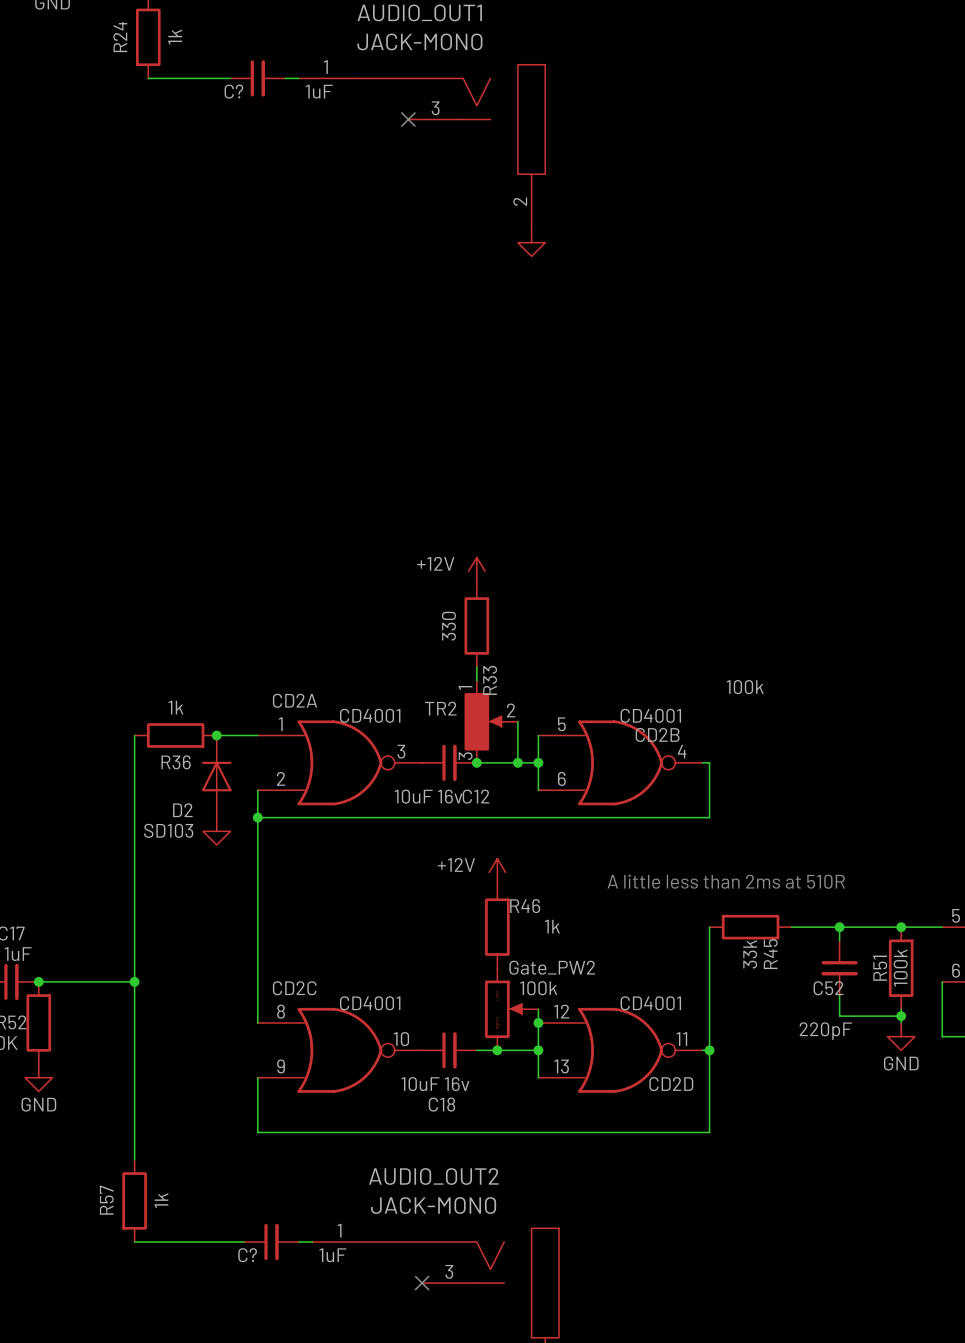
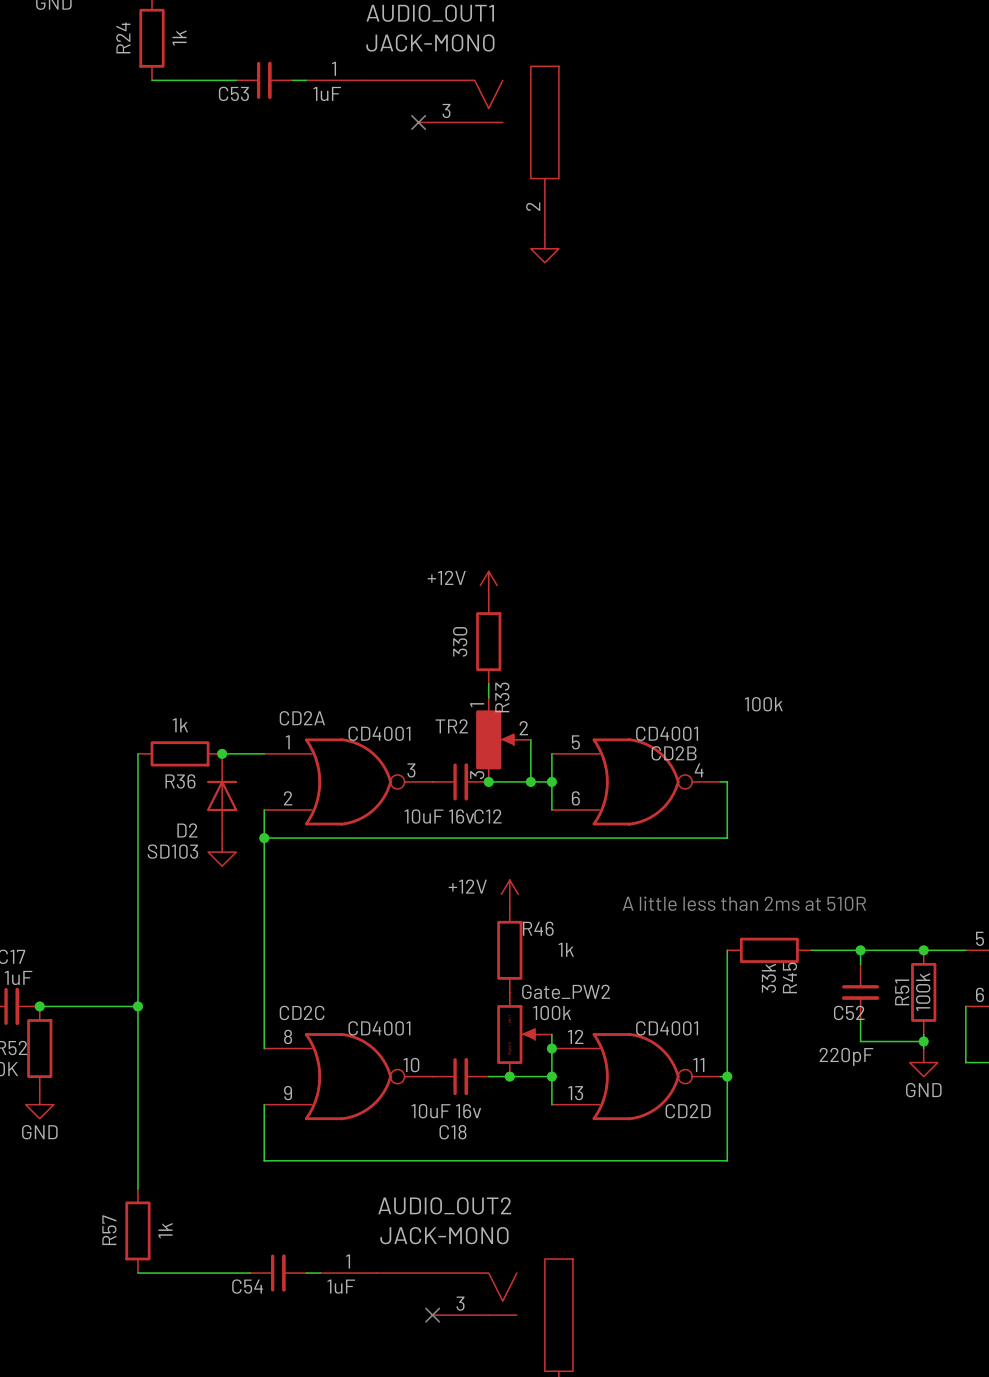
C? name: C? (233, 91) -> C53 (233, 93)
C? name: C? (247, 1255) -> C54 (247, 1286)

